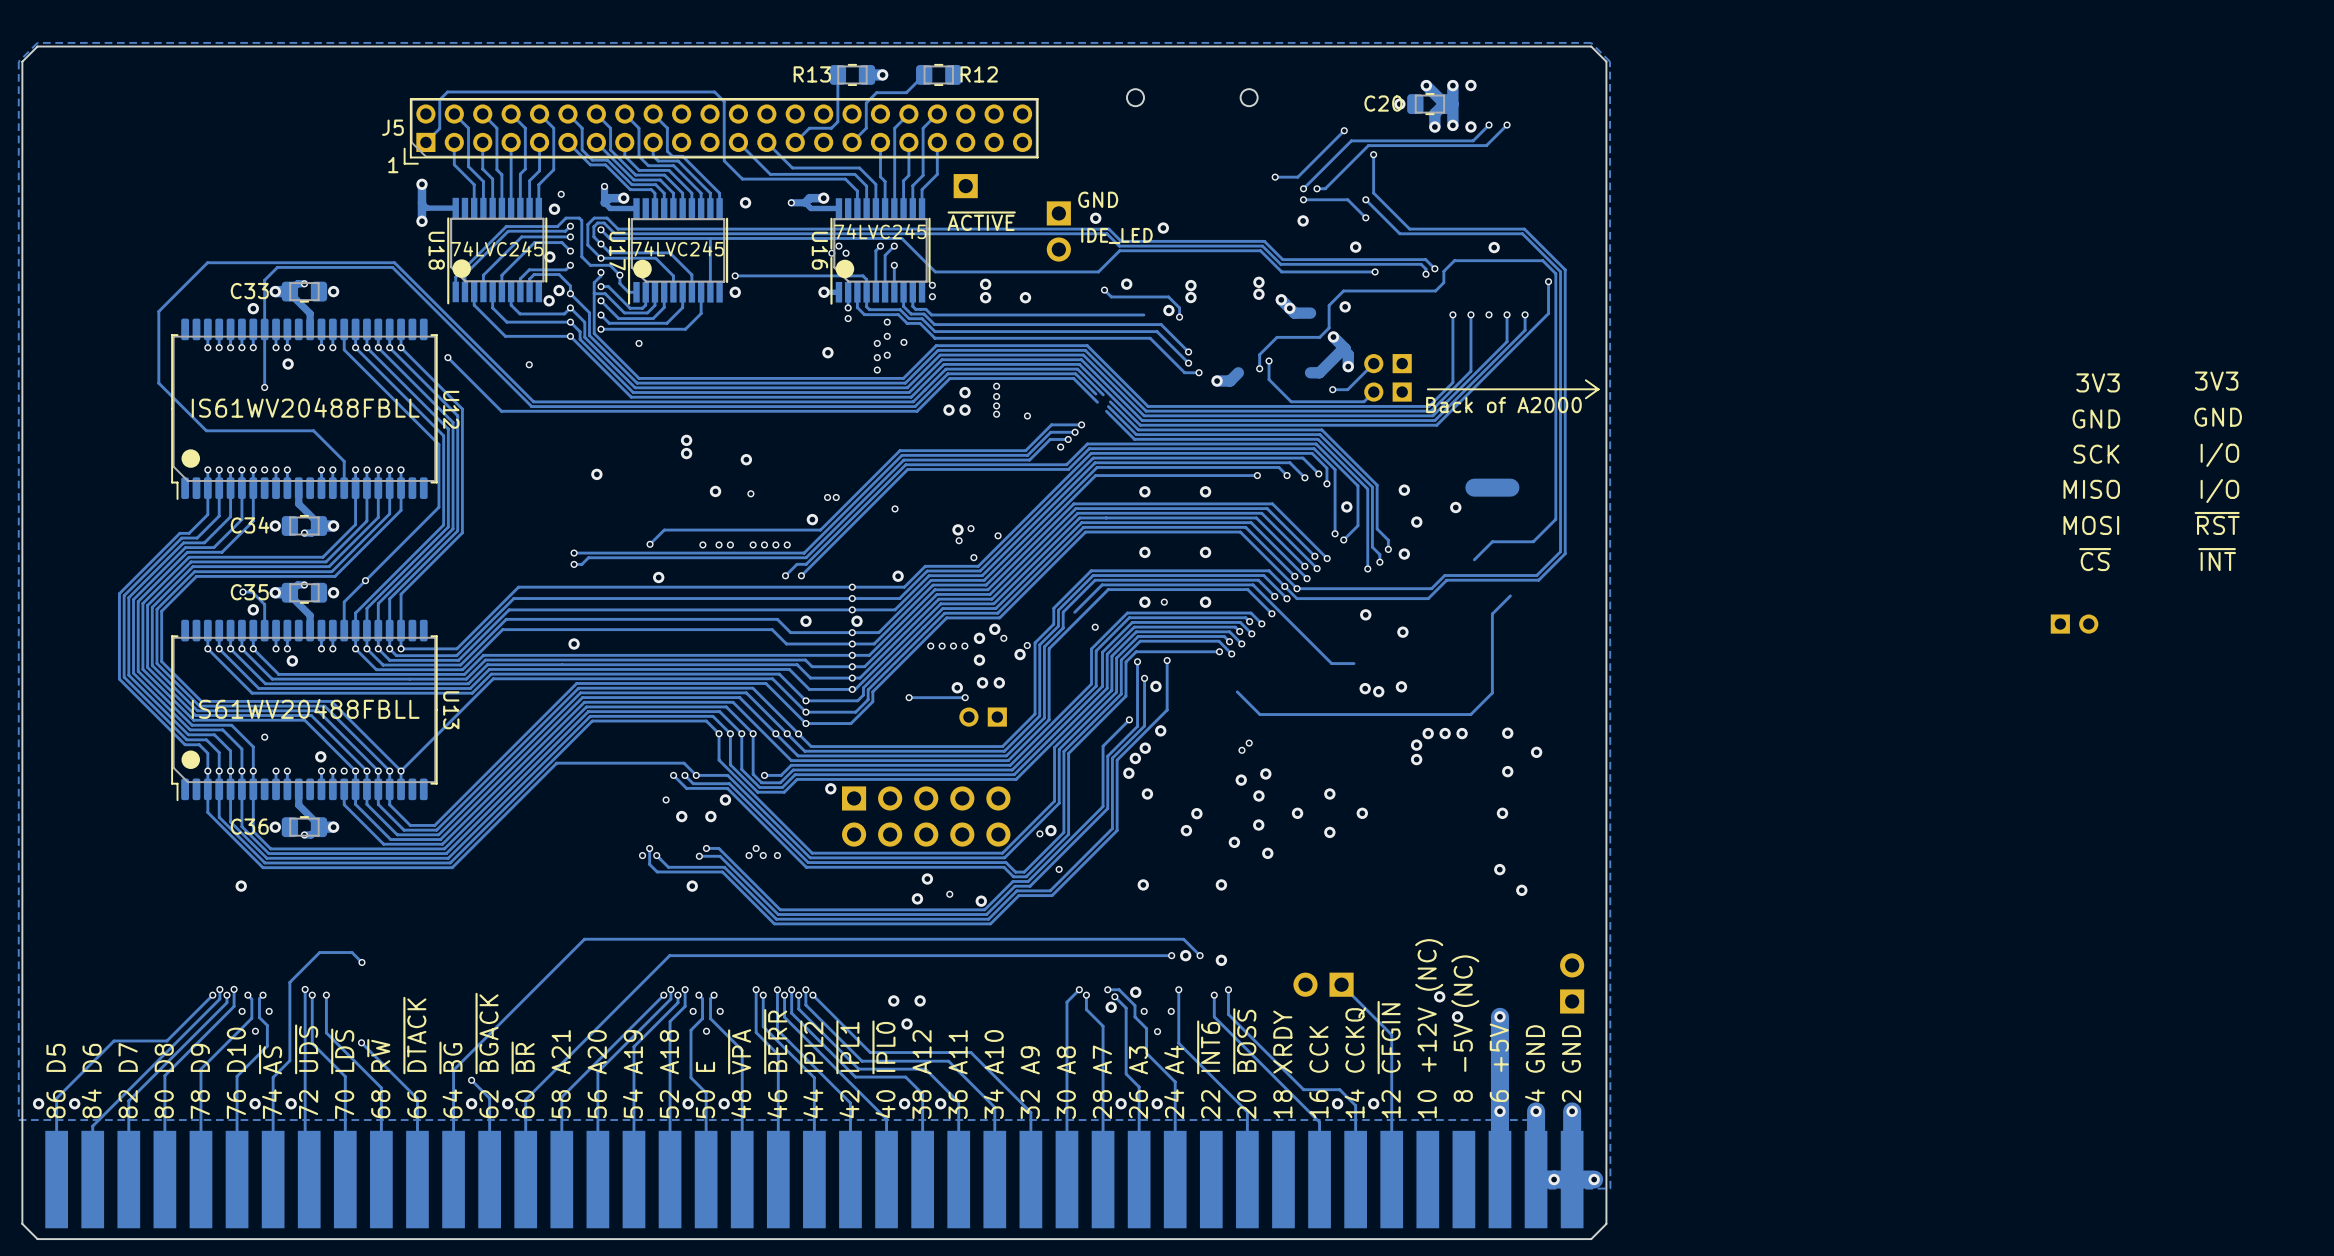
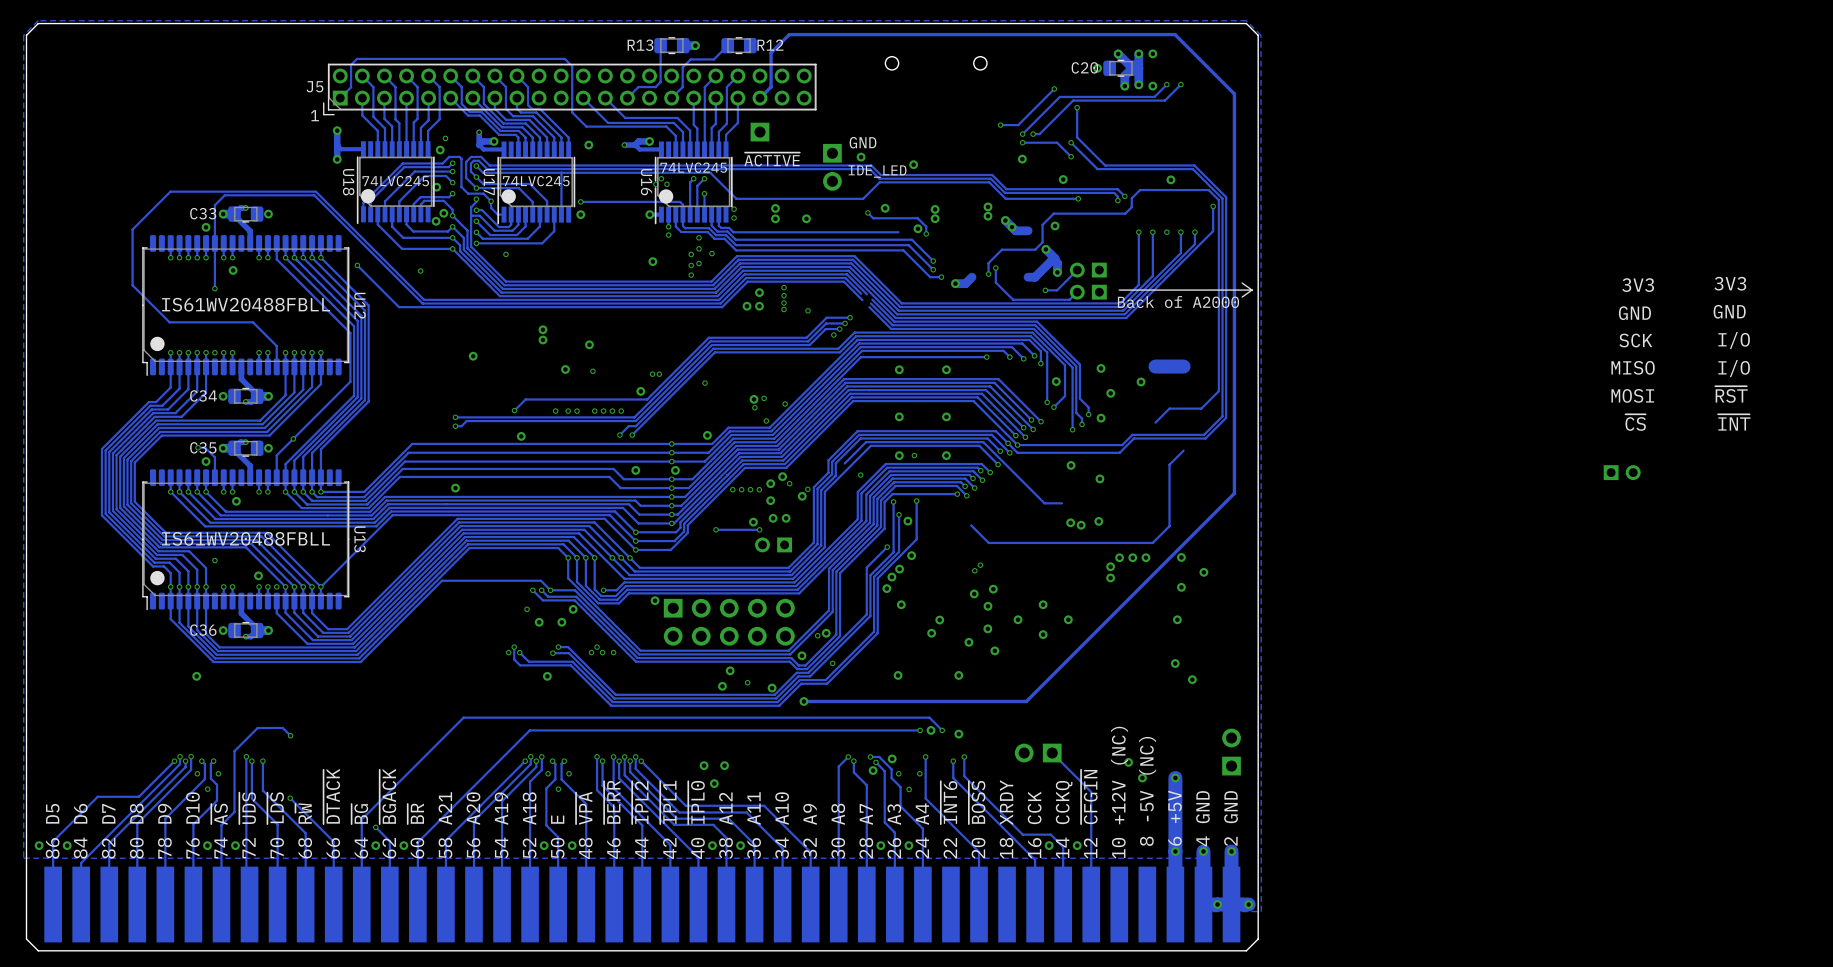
track: none -> (760, 98) (771, 87) (771, 52) (789, 34) (1175, 34) (1234, 93) (1234, 493) (1026, 701) (803, 701)
via: none -> (801, 655)
via: none -> (803, 701)

